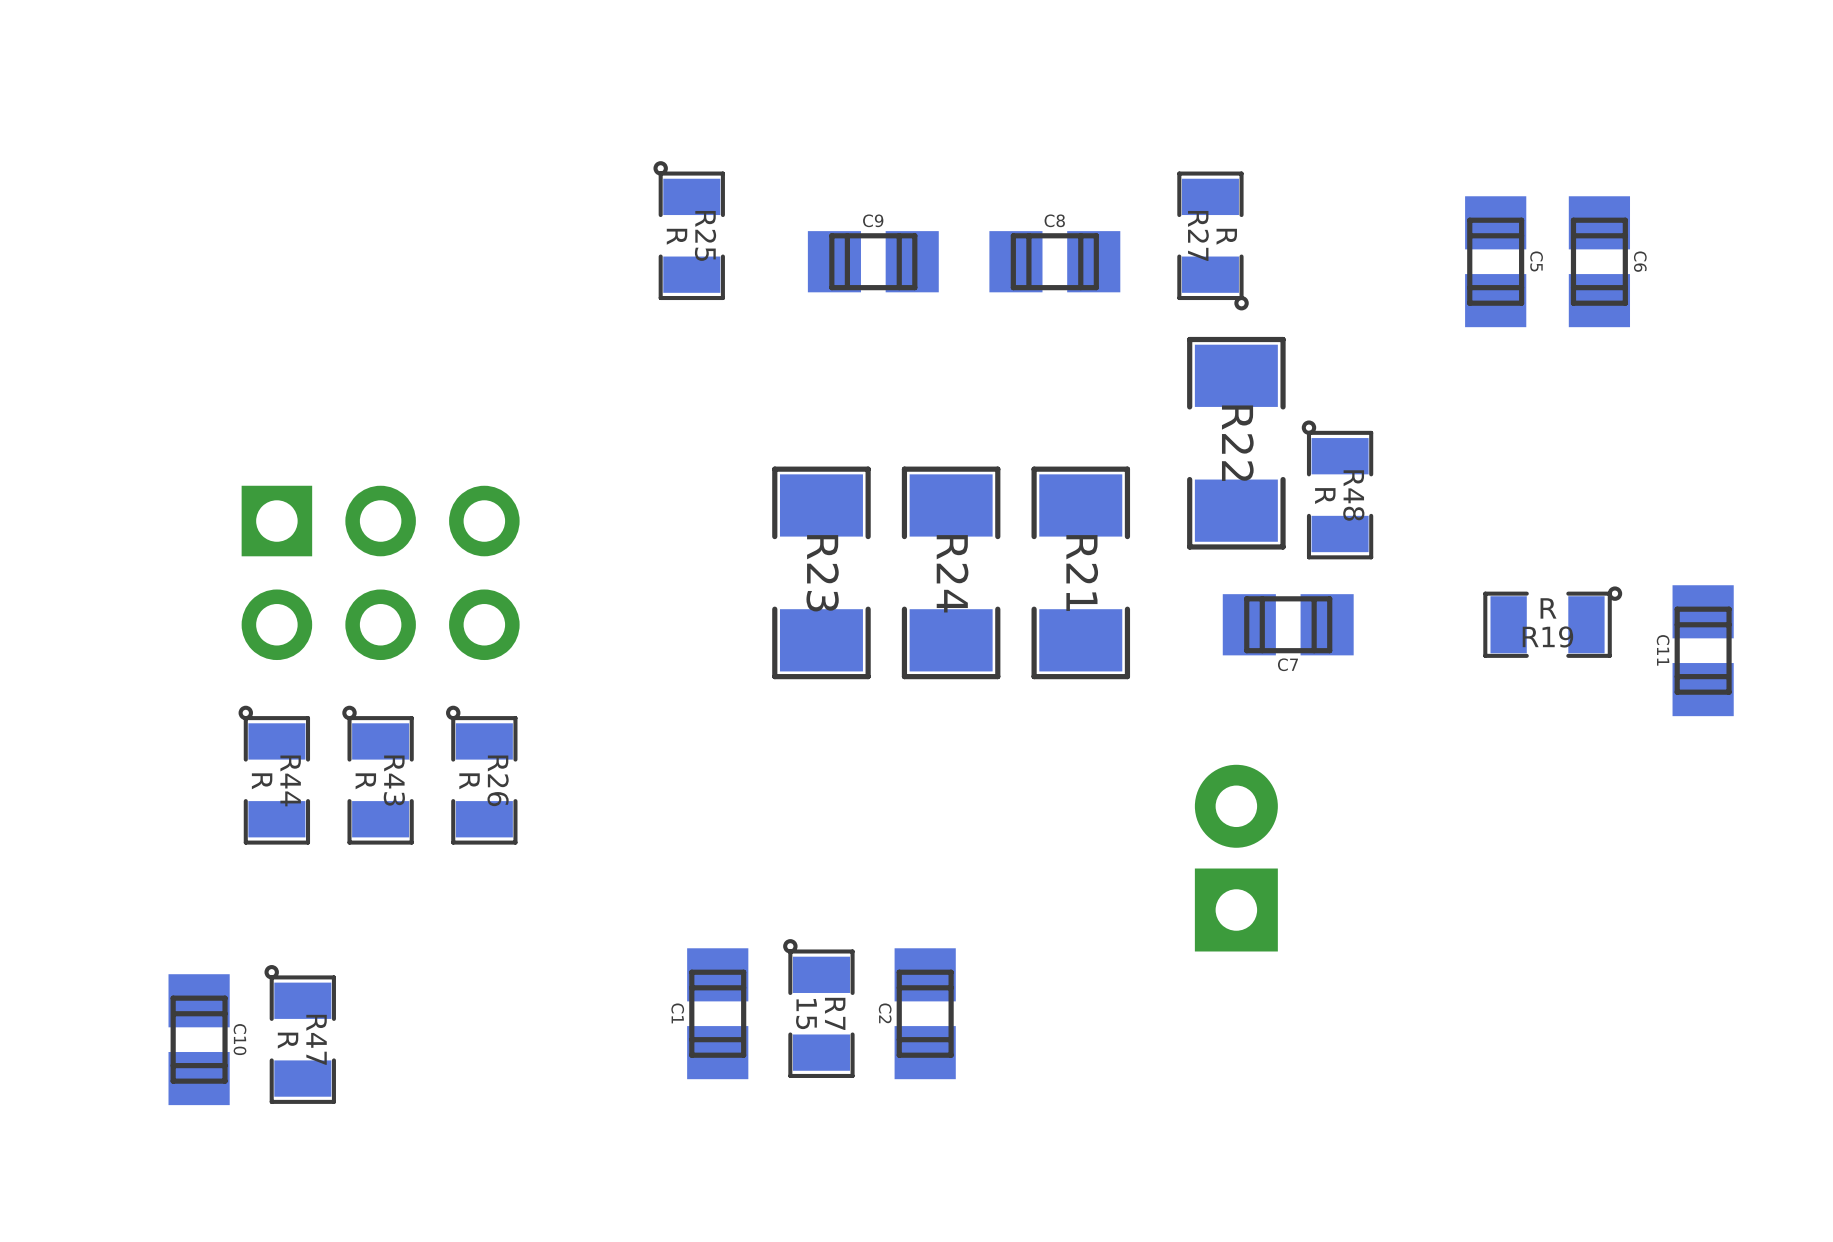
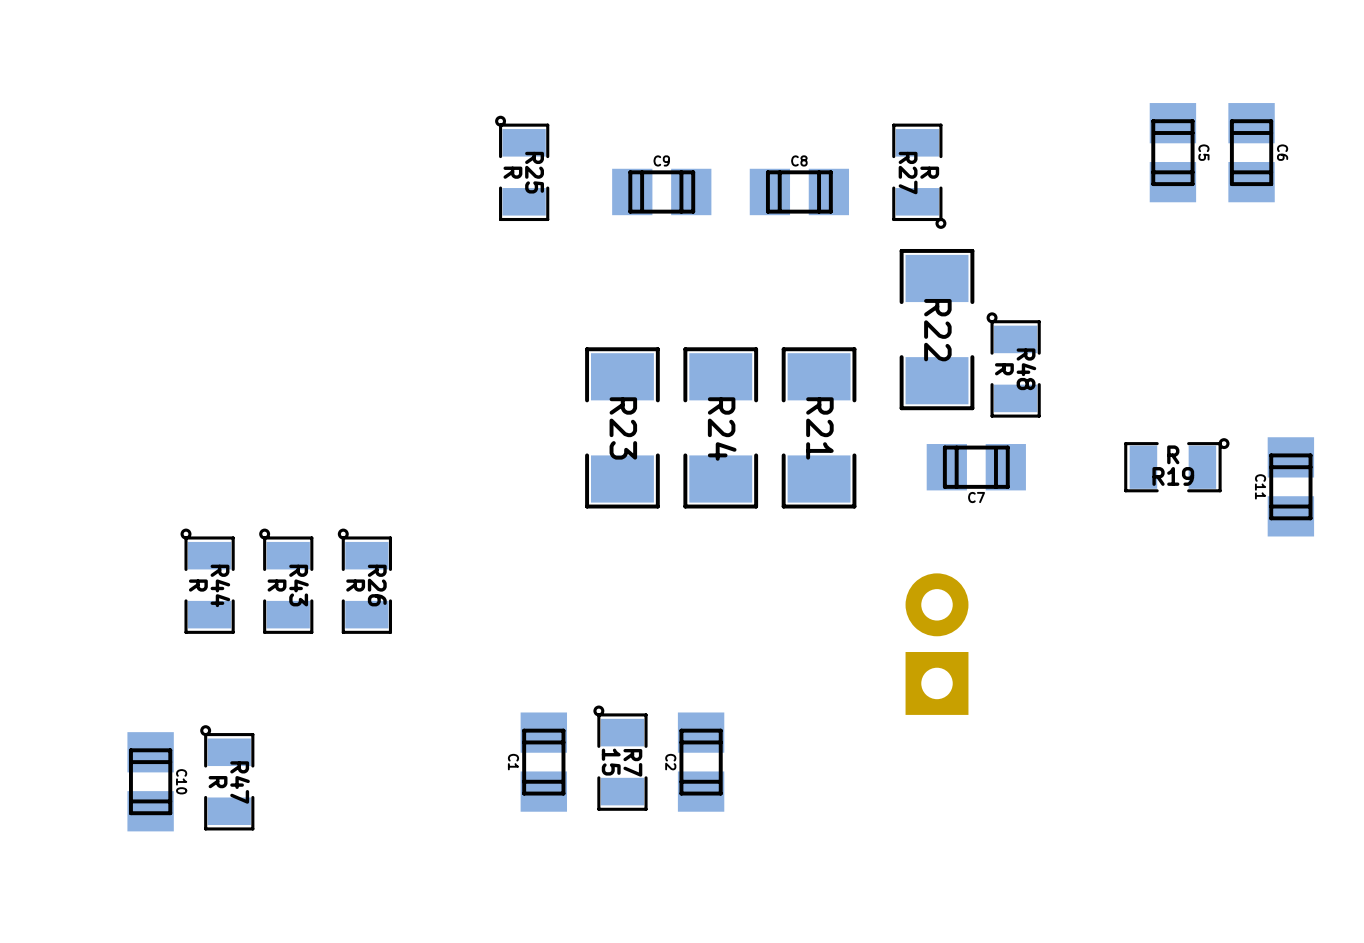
C5 position: (1495, 261) -> (1172, 152)
C6 position: (1599, 261) -> (1251, 152)
part: (380, 572) -> none

